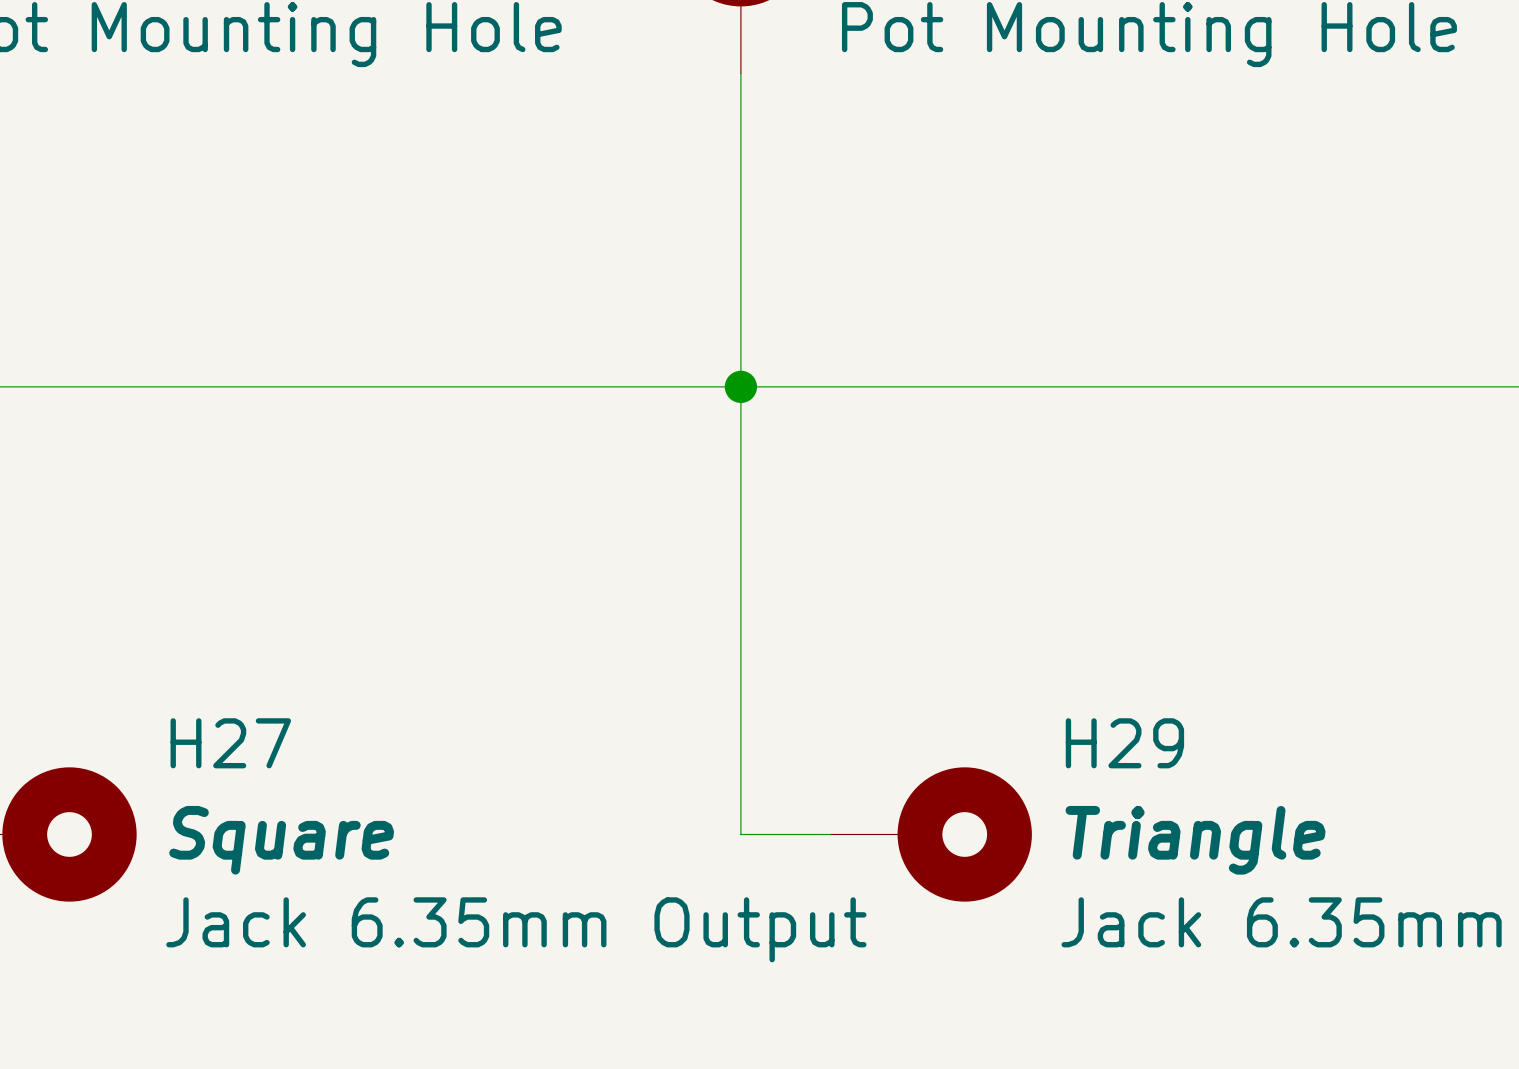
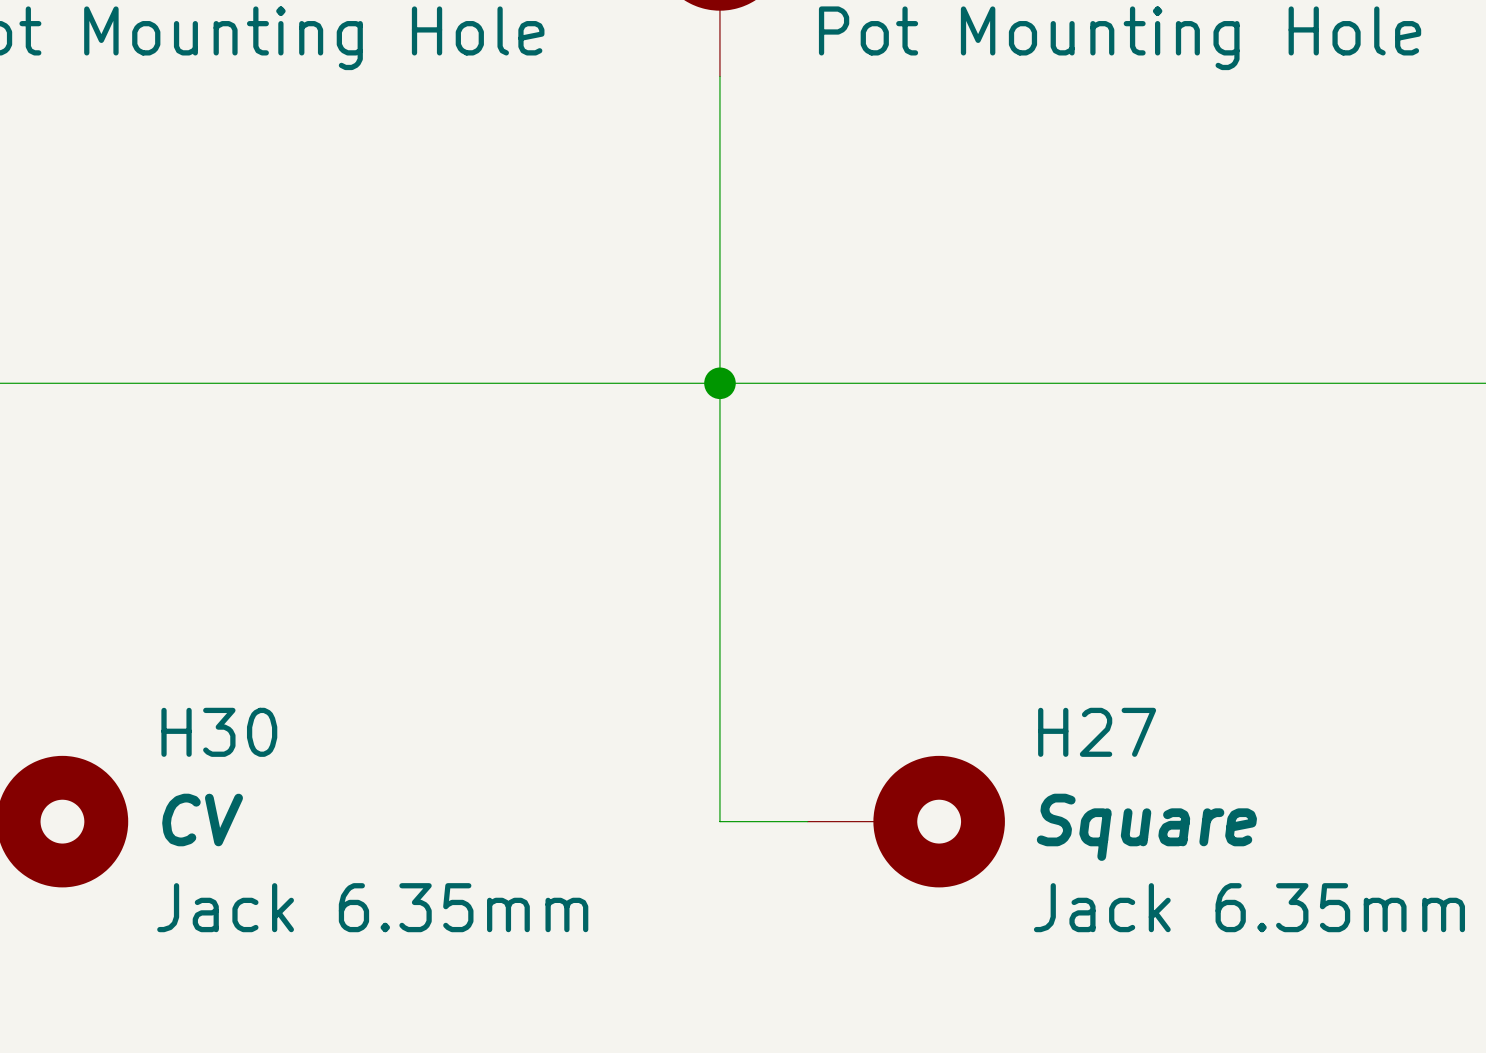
H27 name: H27 (230, 743) -> H30 (219, 732)
H29 name: H29 (1124, 743) -> H27 (1097, 732)
H27 value: Square (281, 840) -> CV (202, 820)
H29 value: Triangle (1195, 840) -> Square (1146, 827)
H27 text: Jack 6.35mm Output (516, 929) -> Jack 6.35mm (372, 907)

